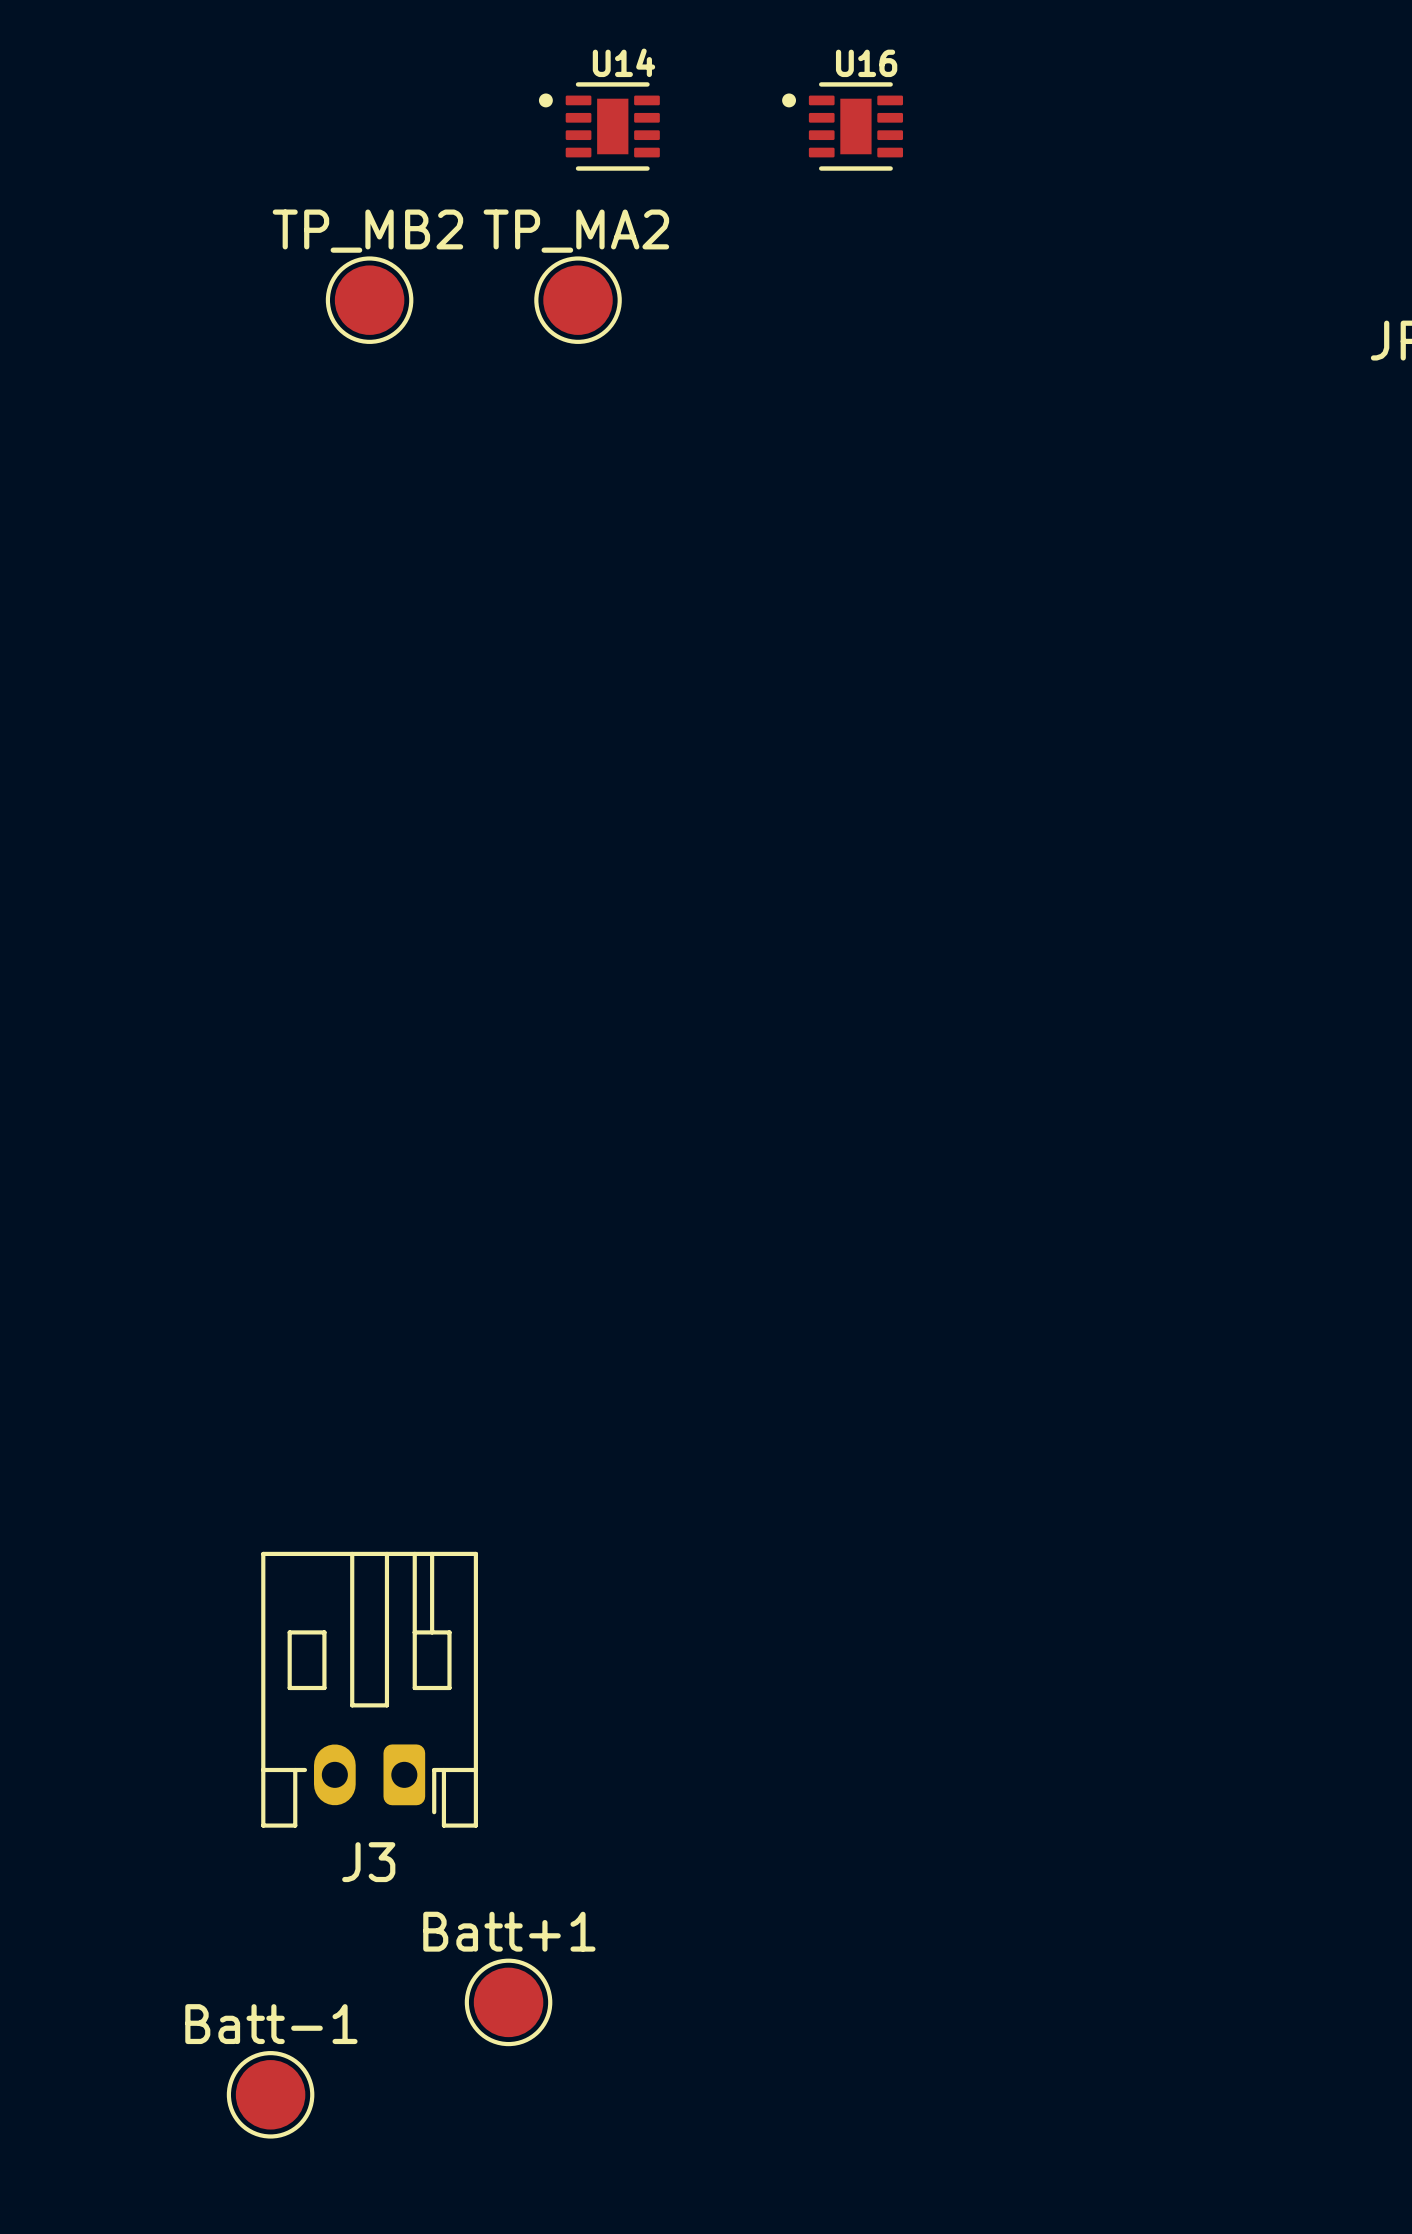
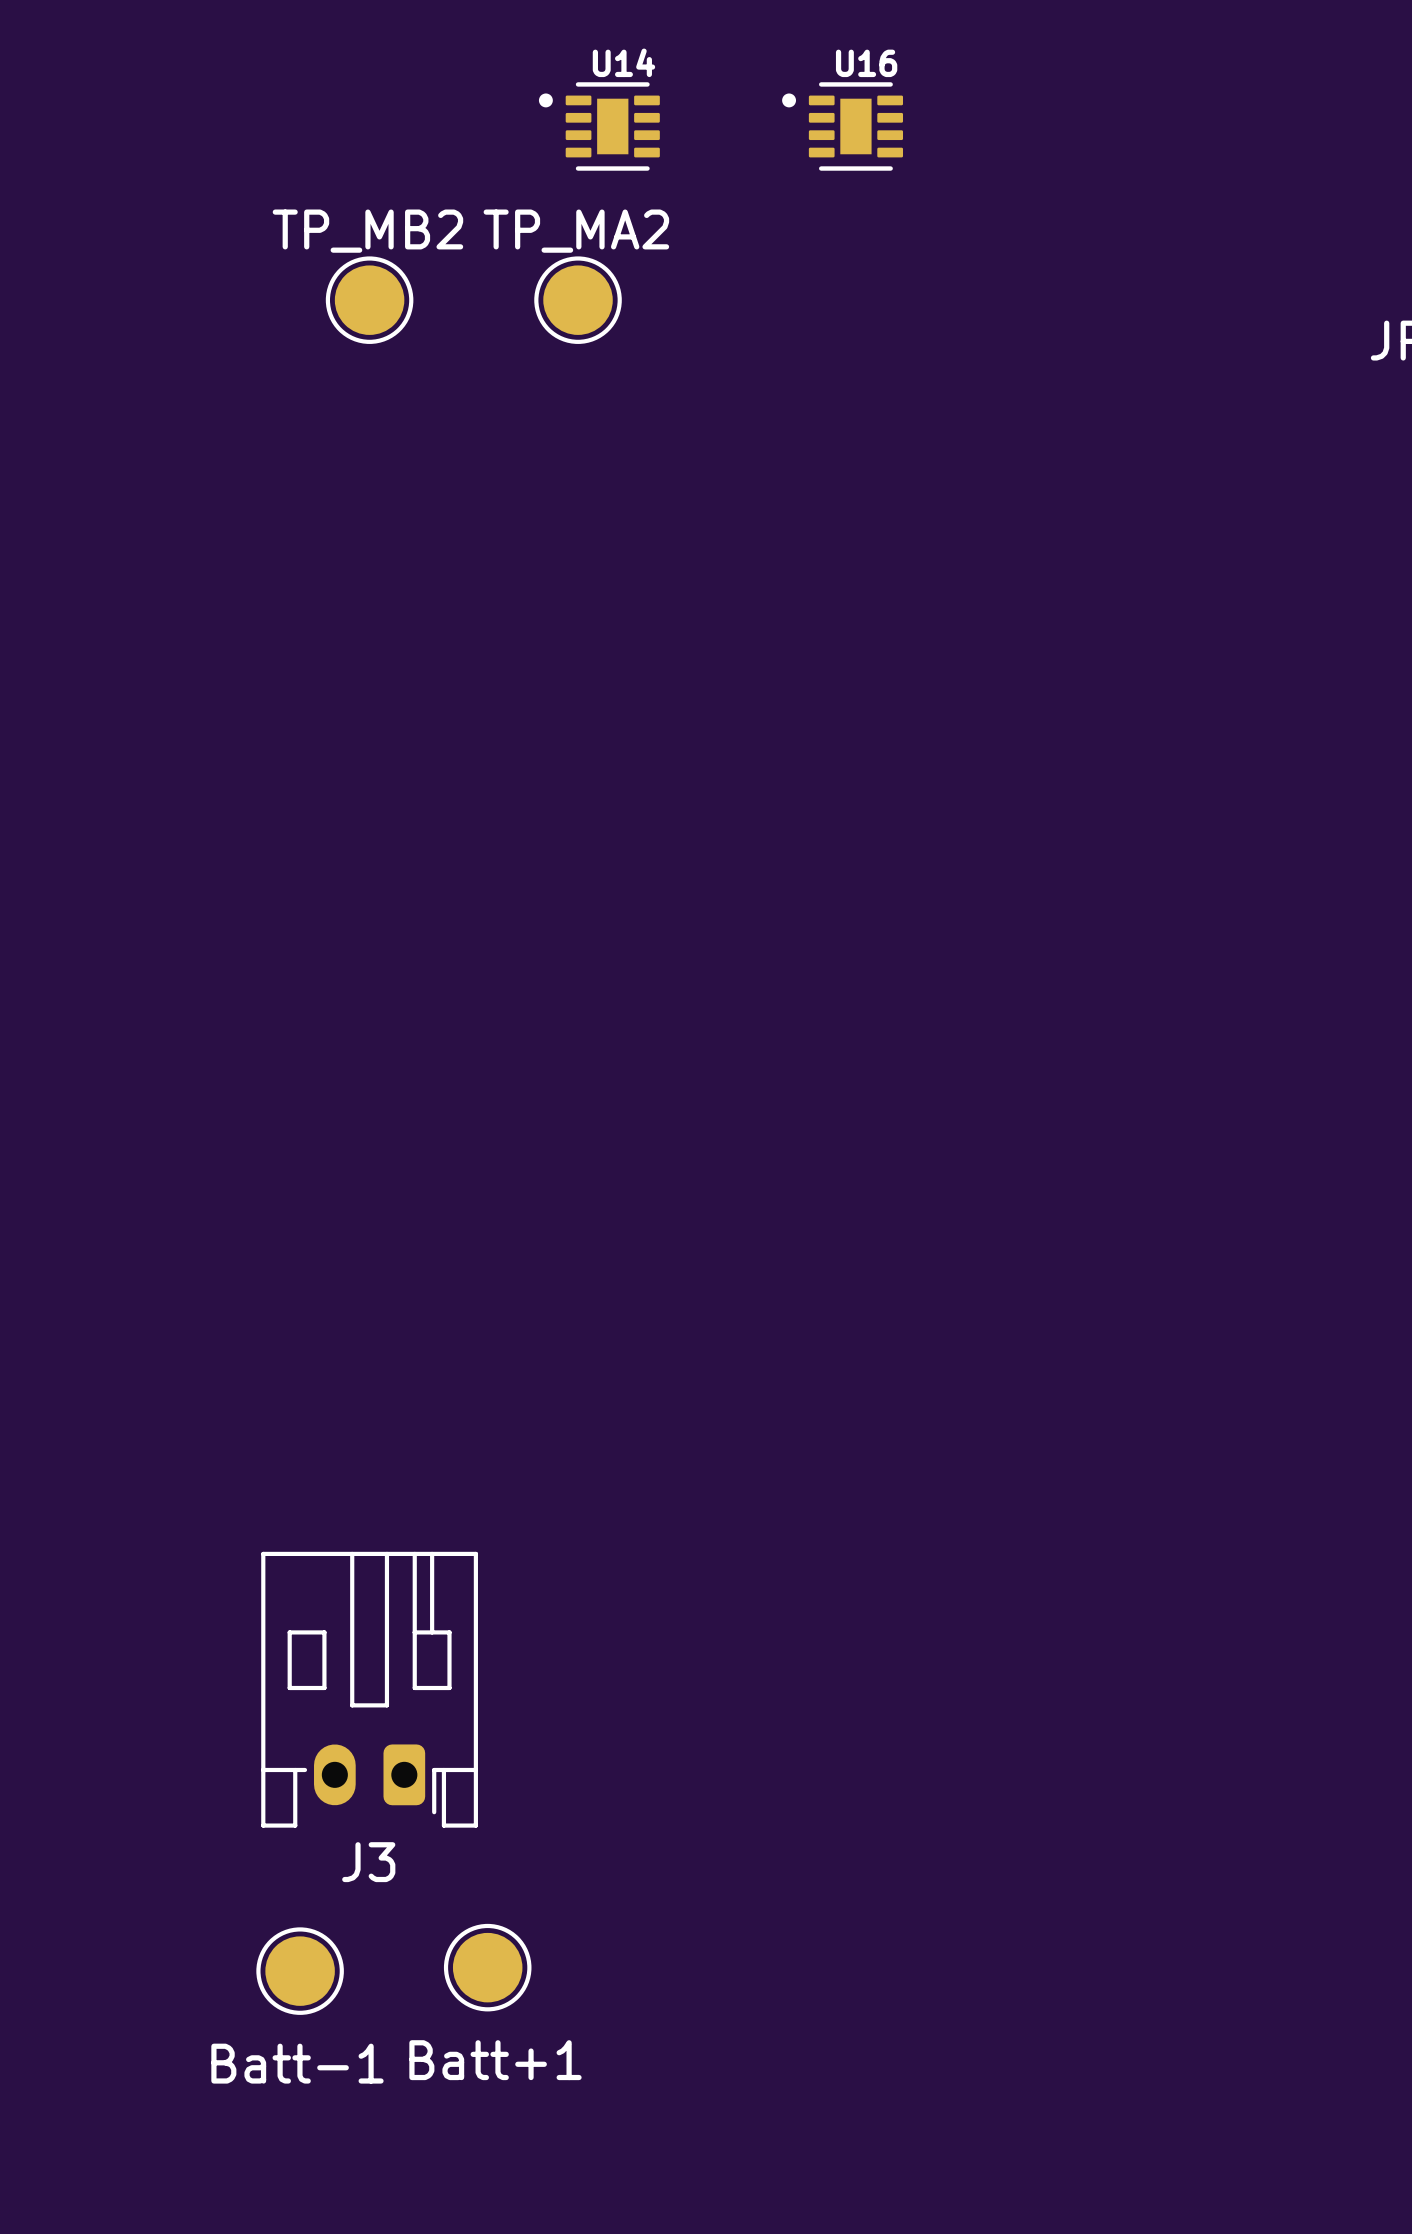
Batt+1 name position: Batt+1 (509, 1931) -> Batt+1 (495, 2060)
Batt+1 position: (508, 2002) -> (487, 1967)
Batt-1 name position: Batt-1 (271, 2024) -> Batt-1 (297, 2063)
Batt-1 position: (270, 2094) -> (300, 1971)

